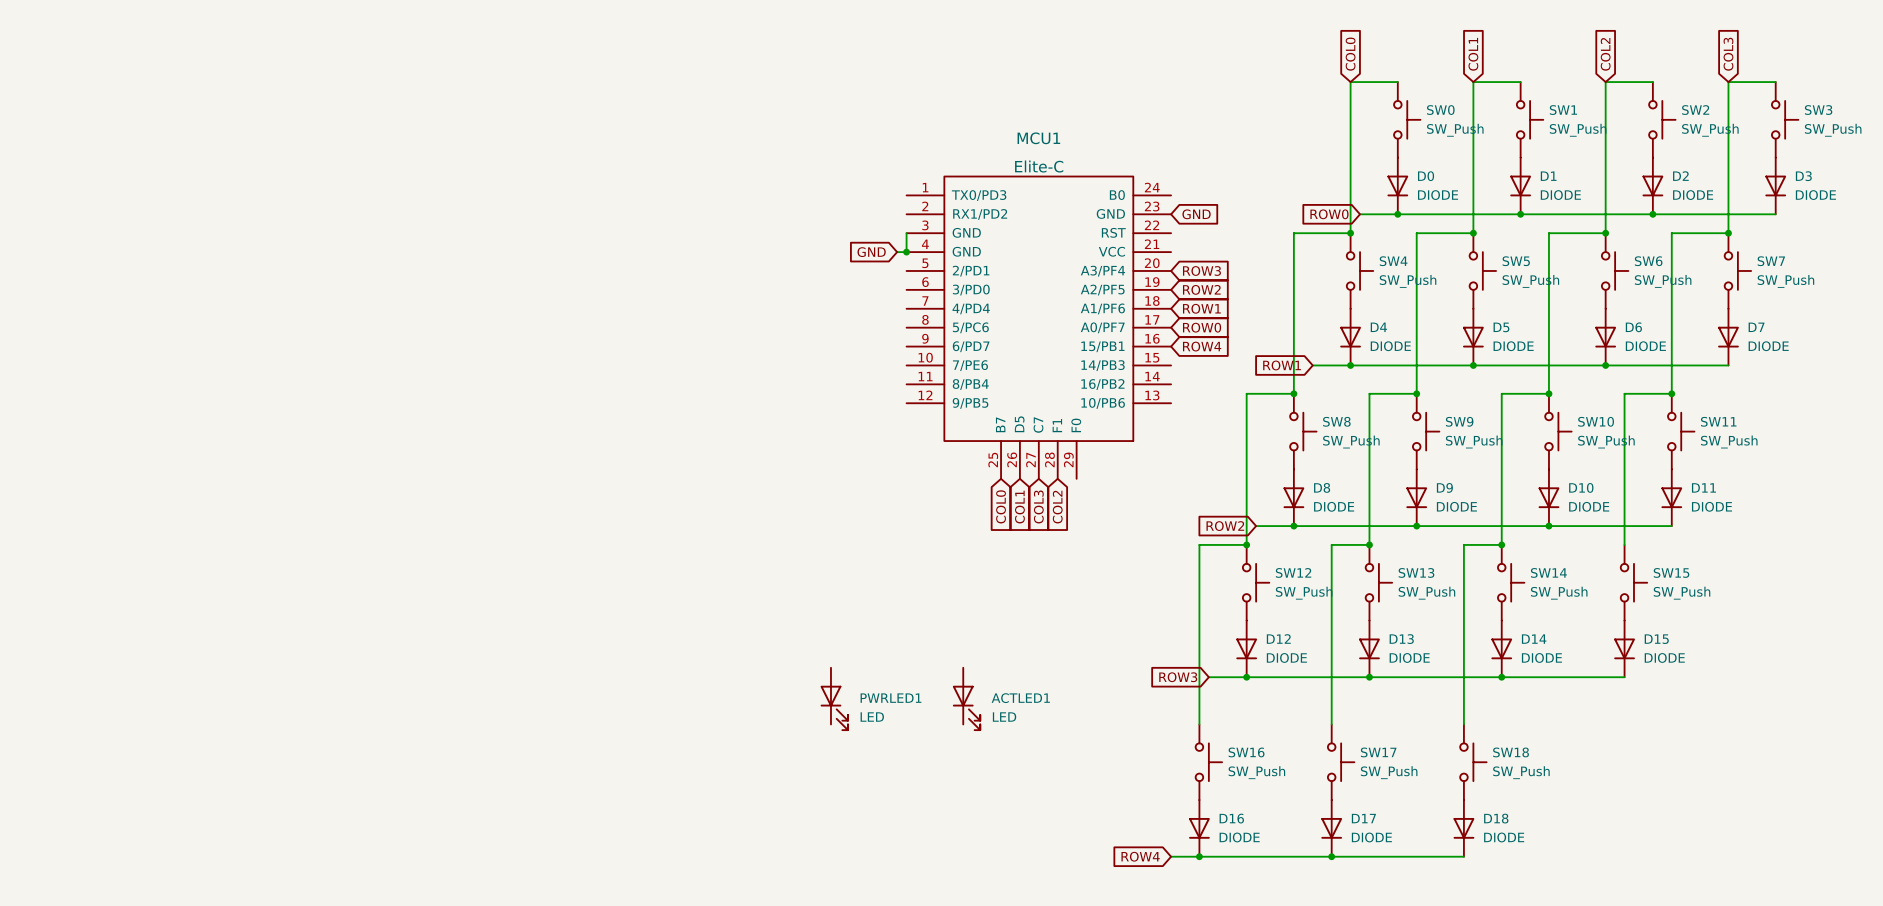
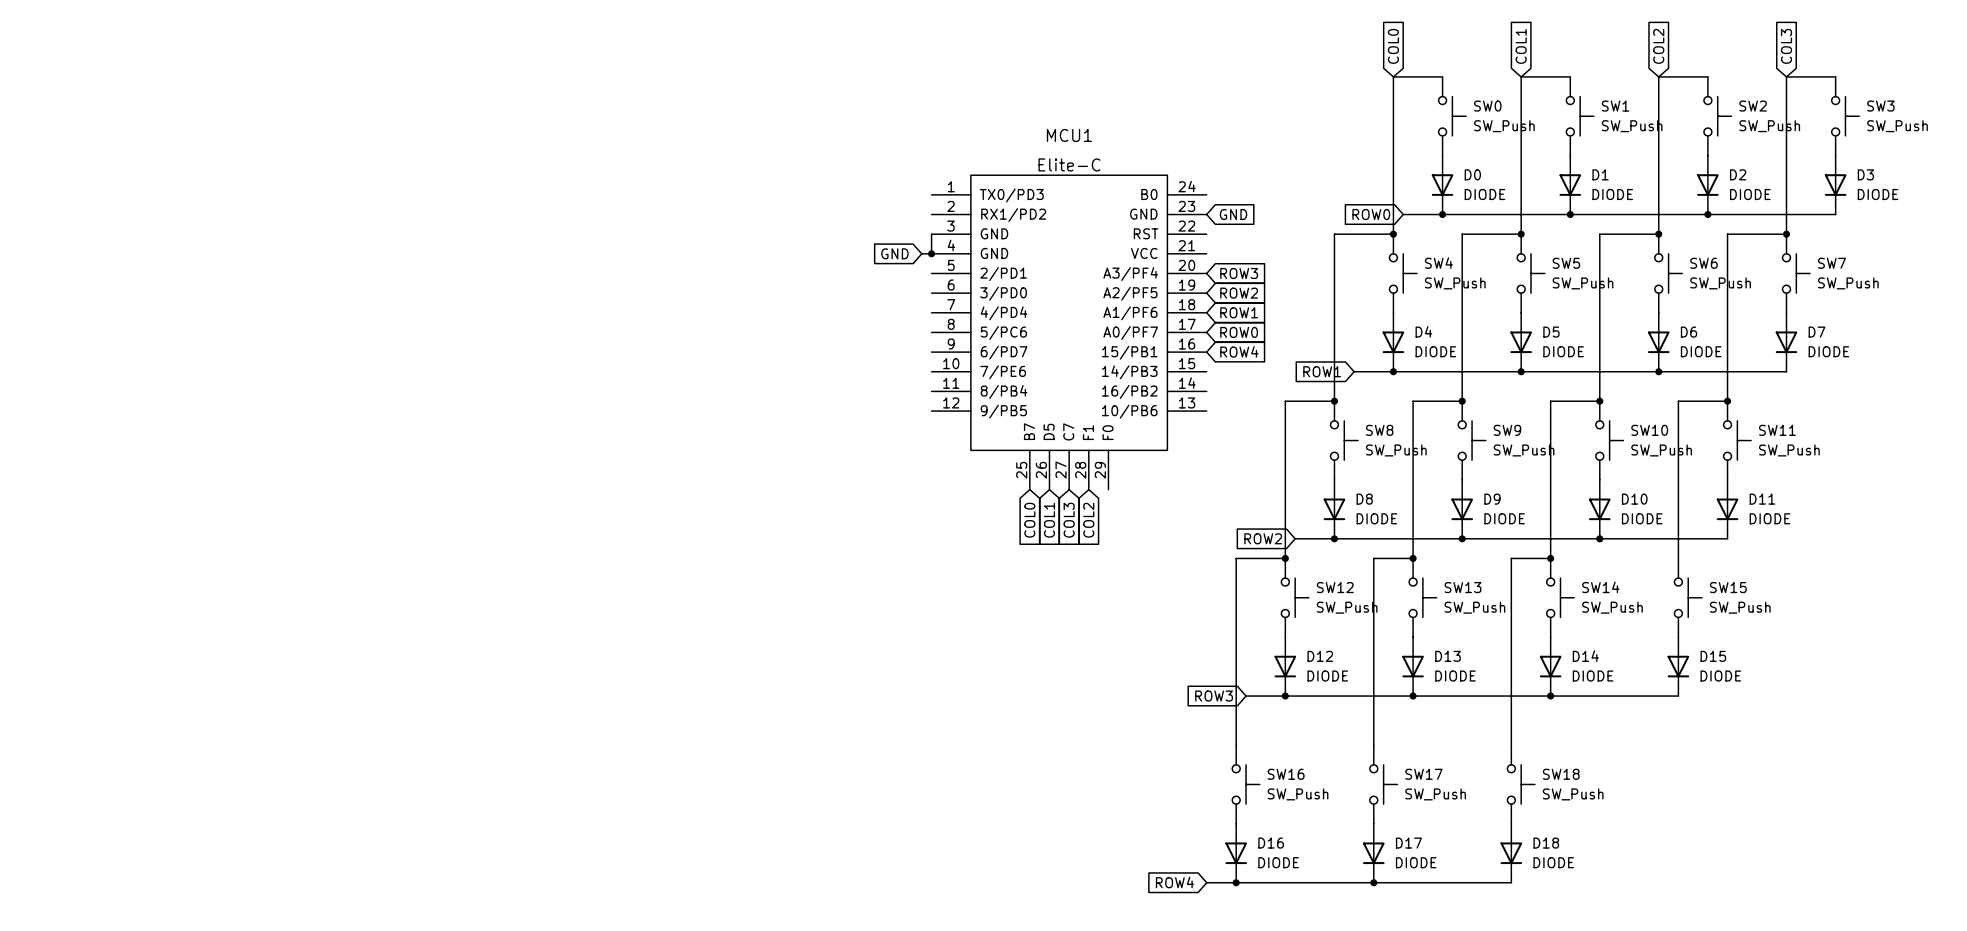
PWRLED1: LED (834, 698) -> none
ACTLED1: LED (966, 698) -> none

